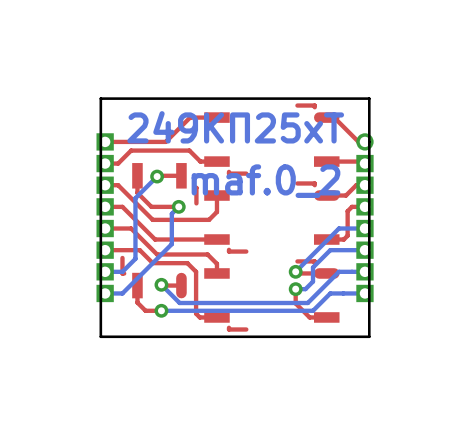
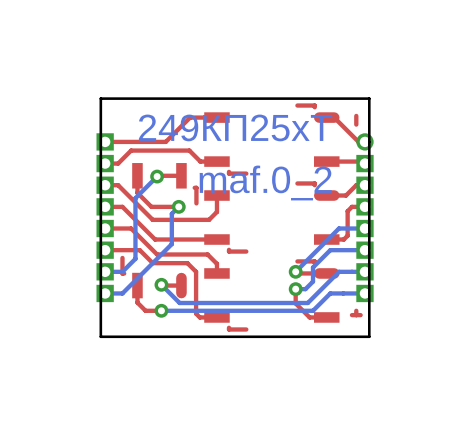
top track: none -> (356, 115) (356, 124)
top track: none -> (356, 310) (356, 315)
top track: none -> (360, 315) (351, 315)

